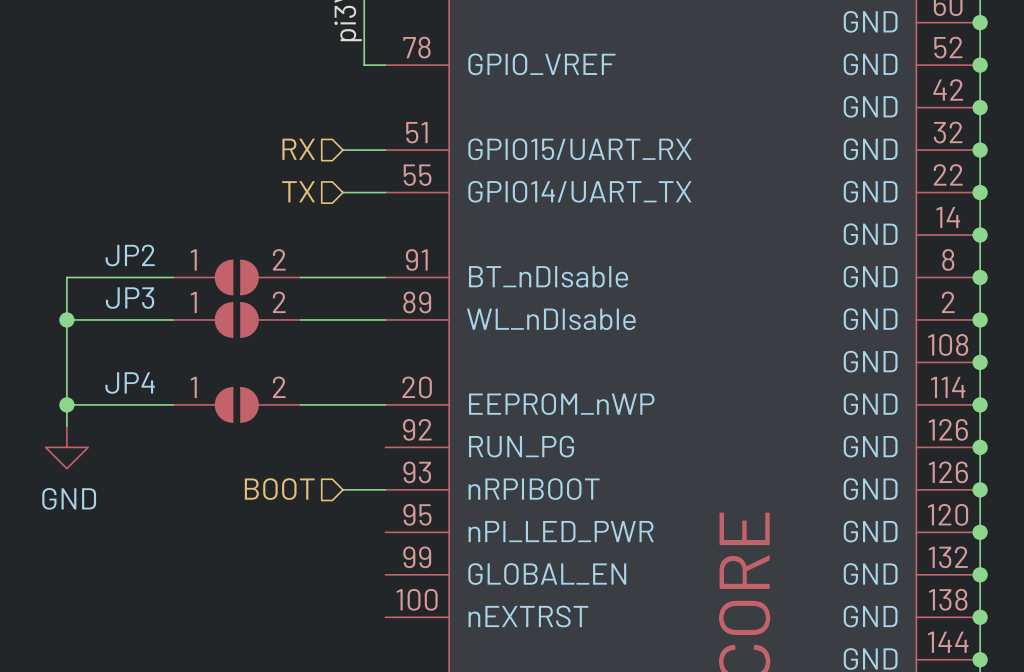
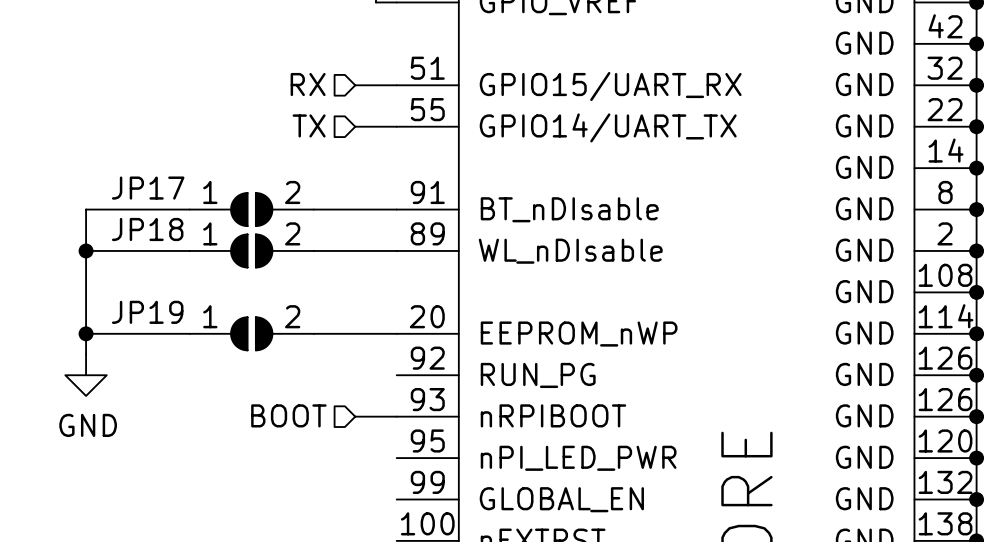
JP2 name: JP2 (130, 255) -> JP17 (148, 188)
JP3 name: JP3 (130, 298) -> JP18 (147, 229)
JP4 name: JP4 (130, 383) -> JP19 (147, 312)

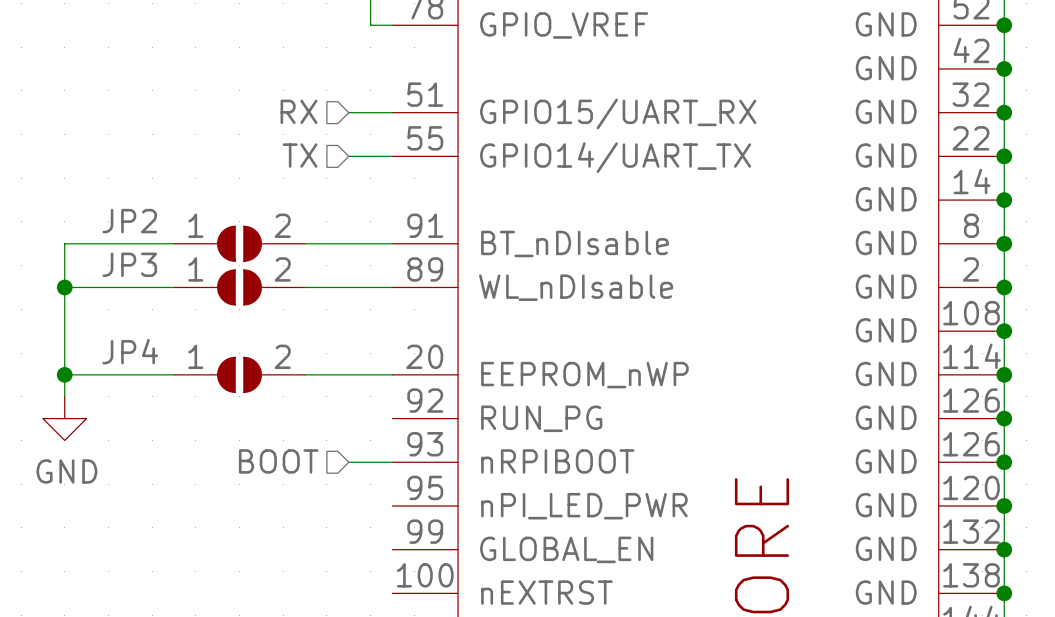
JP17 name: JP17 (148, 188) -> JP2 (129, 221)
JP18 name: JP18 (147, 229) -> JP3 (129, 264)
JP19 name: JP19 (147, 312) -> JP4 (130, 351)

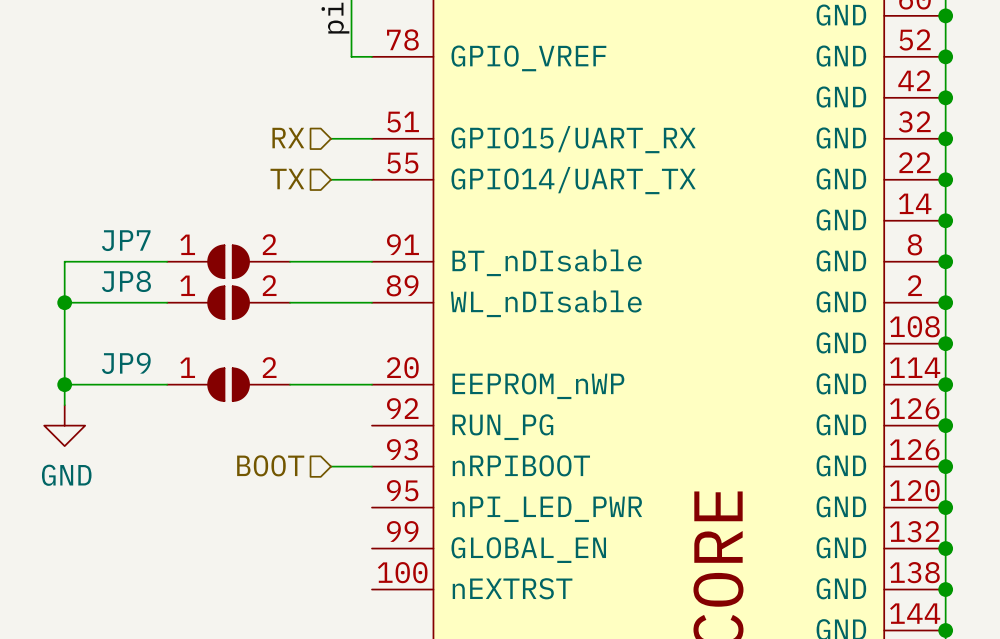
JP2 name: JP2 (129, 221) -> JP7 (126, 240)
JP3 name: JP3 (129, 264) -> JP8 (126, 281)
JP4 name: JP4 (130, 351) -> JP9 (126, 363)

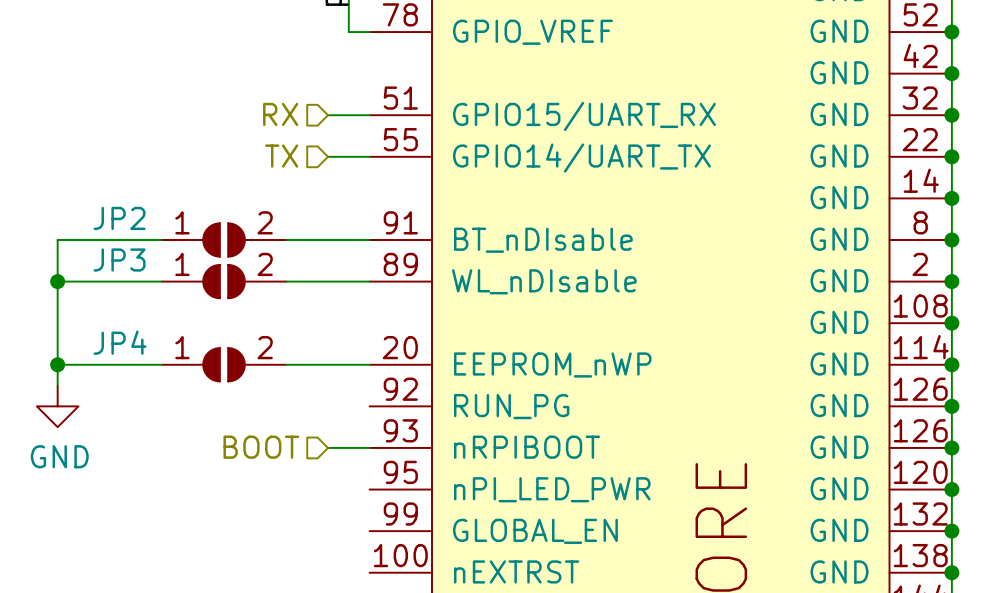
JP7 name: JP7 (126, 240) -> JP2 (119, 218)
JP8 name: JP8 (126, 281) -> JP3 (119, 260)
JP9 name: JP9 (126, 363) -> JP4 (120, 342)

